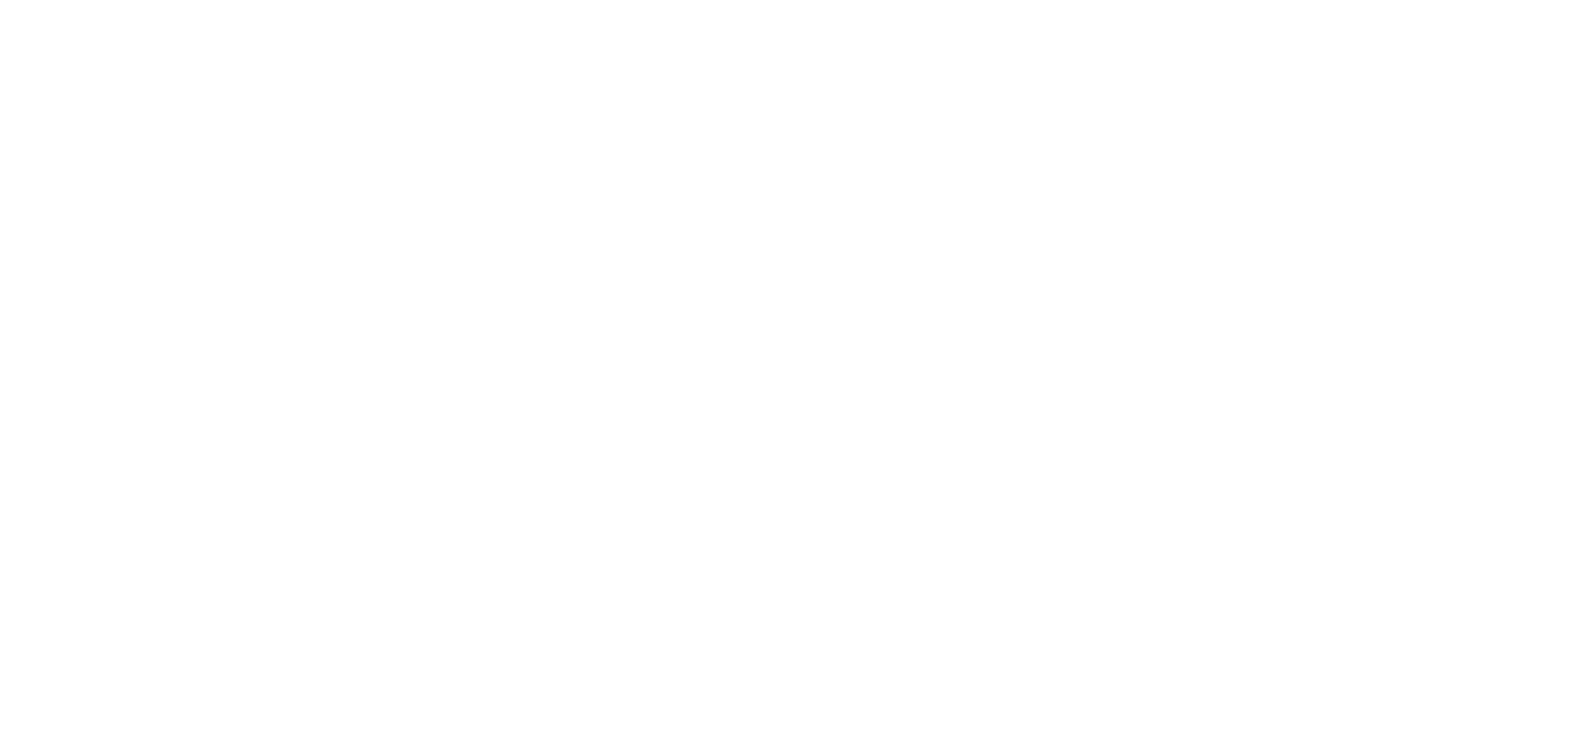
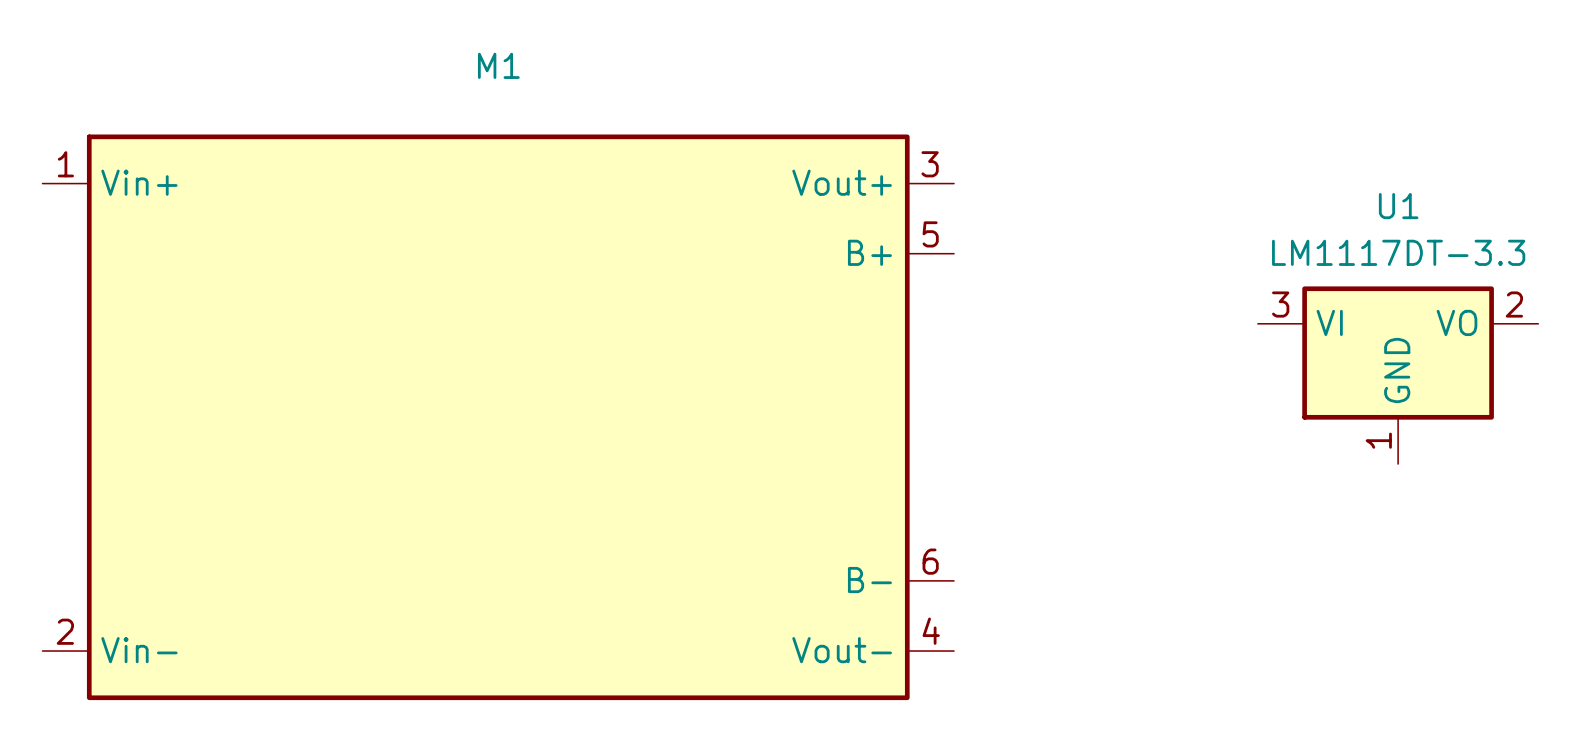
U1: none -> LM1117DT-3.3 (1398, 375)
M1: none -> (498, 417)

